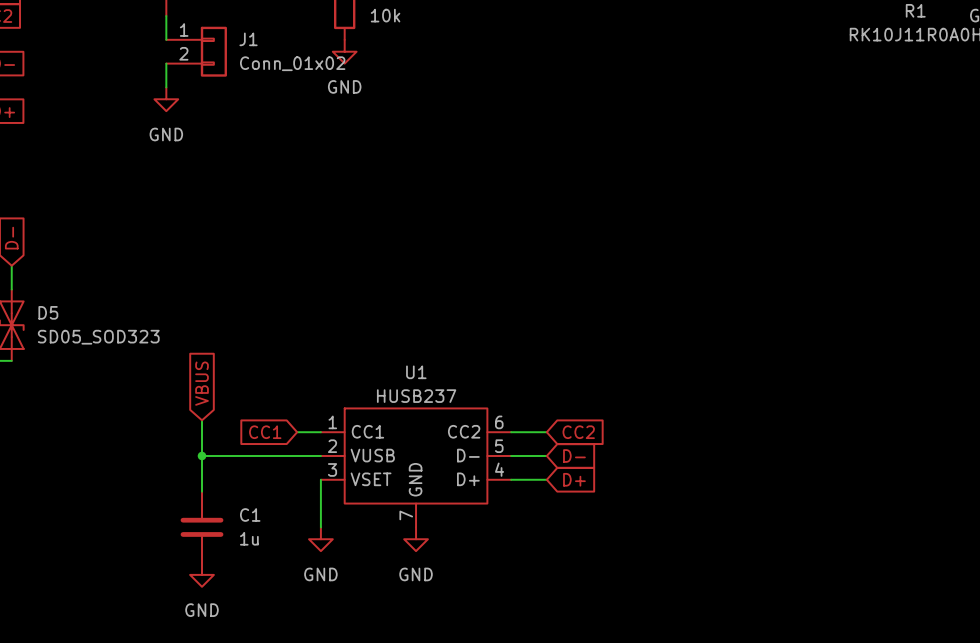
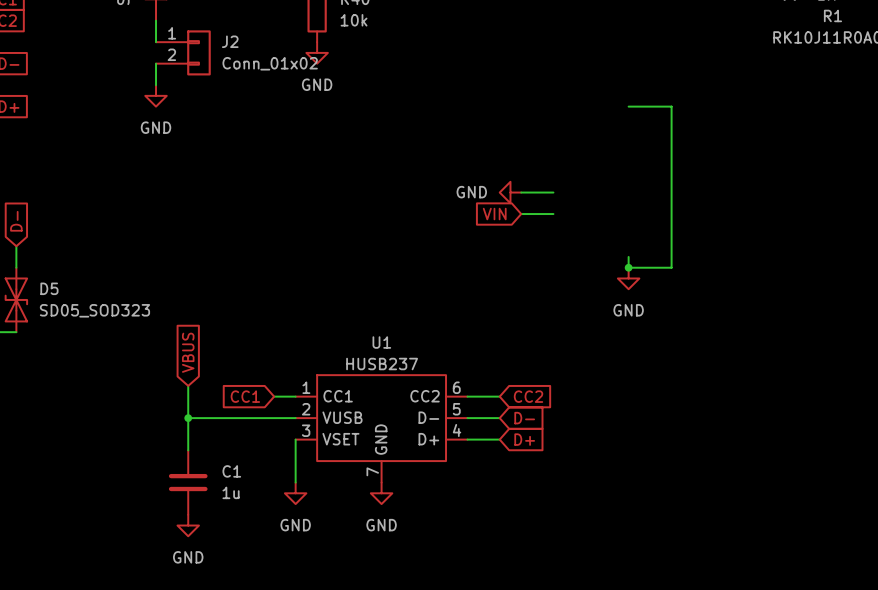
J1 name: J1 (248, 39) -> J2 (230, 41)
wire: none -> (628, 106) (671, 106) (671, 267) (628, 267) (628, 256)
power symbol: none -> GND (510, 192)
wire: none -> (521, 192) (553, 192)
global label: none -> VIN (494, 214)
wire: none -> (521, 214) (553, 214)
junction: none -> (628, 267)
power symbol: none -> GND (628, 278)

